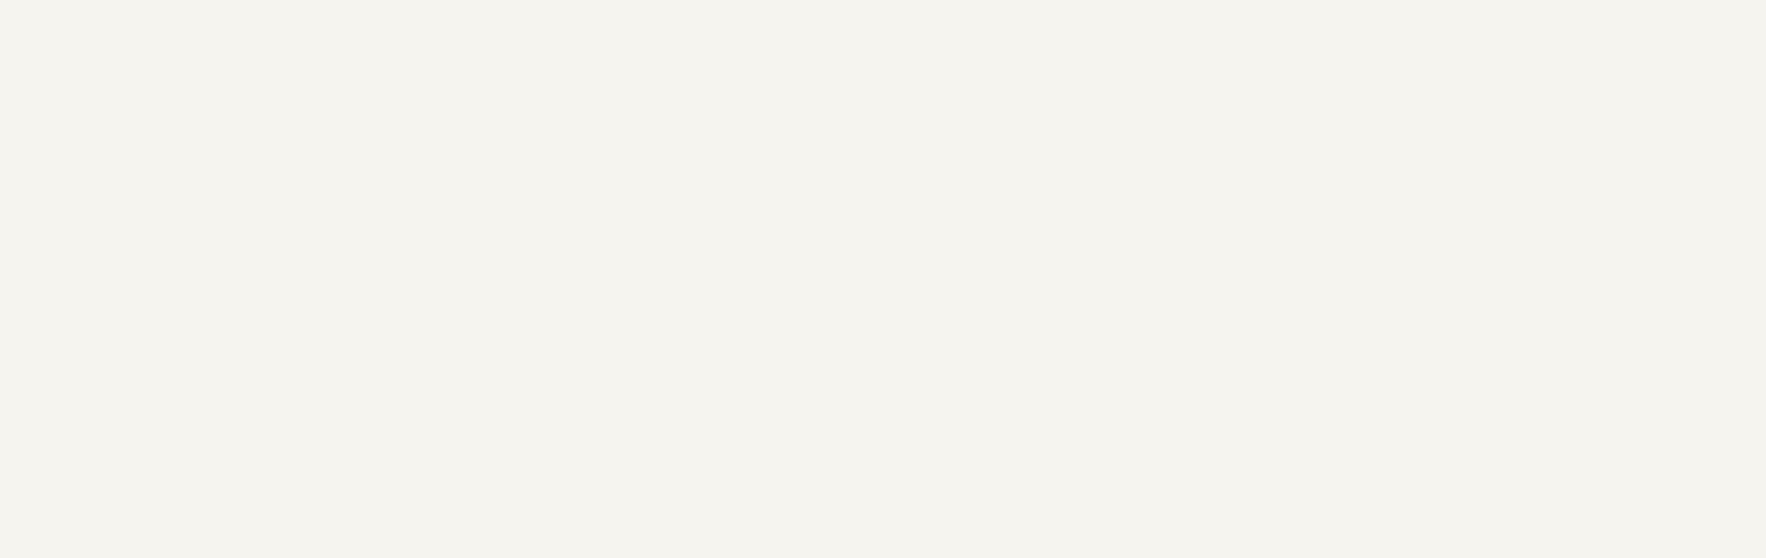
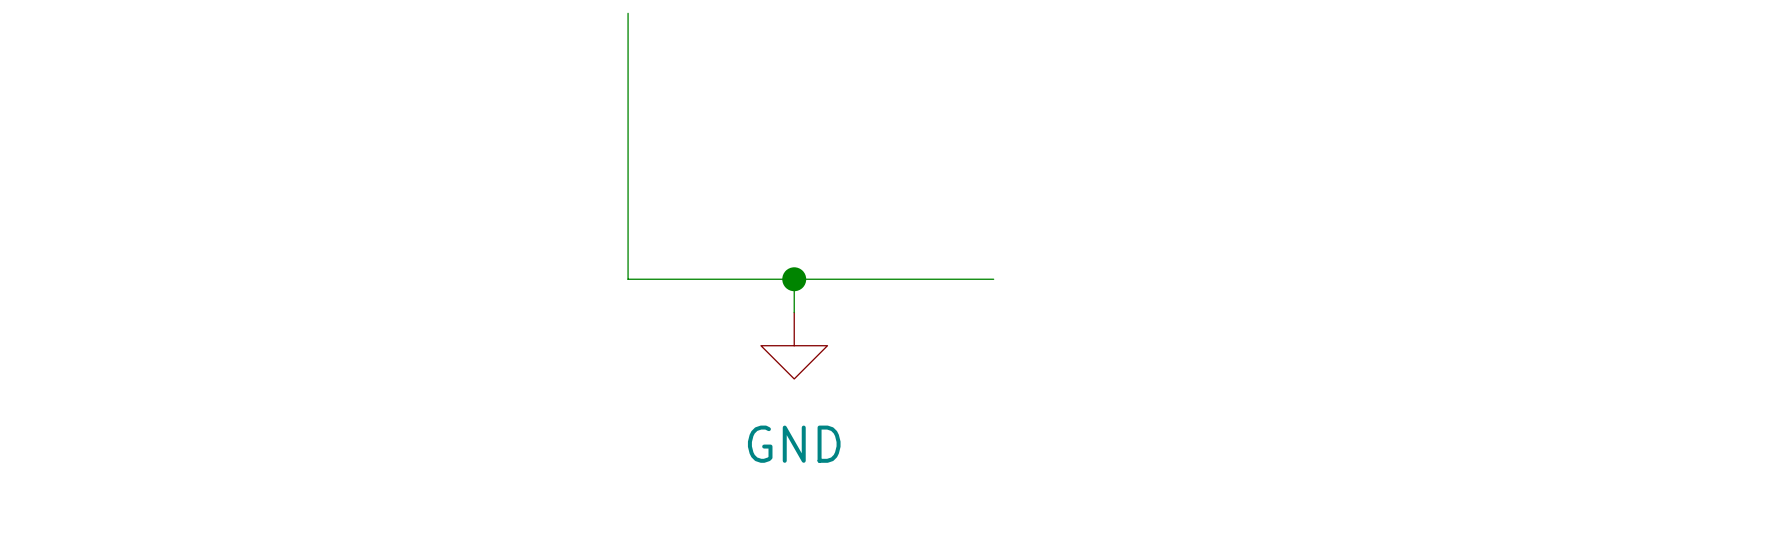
wire: none -> (628, 13) (628, 279) (993, 279)
wire: none -> (794, 279) (794, 312)
junction: none -> (794, 279)
power symbol: none -> GND (794, 345)

